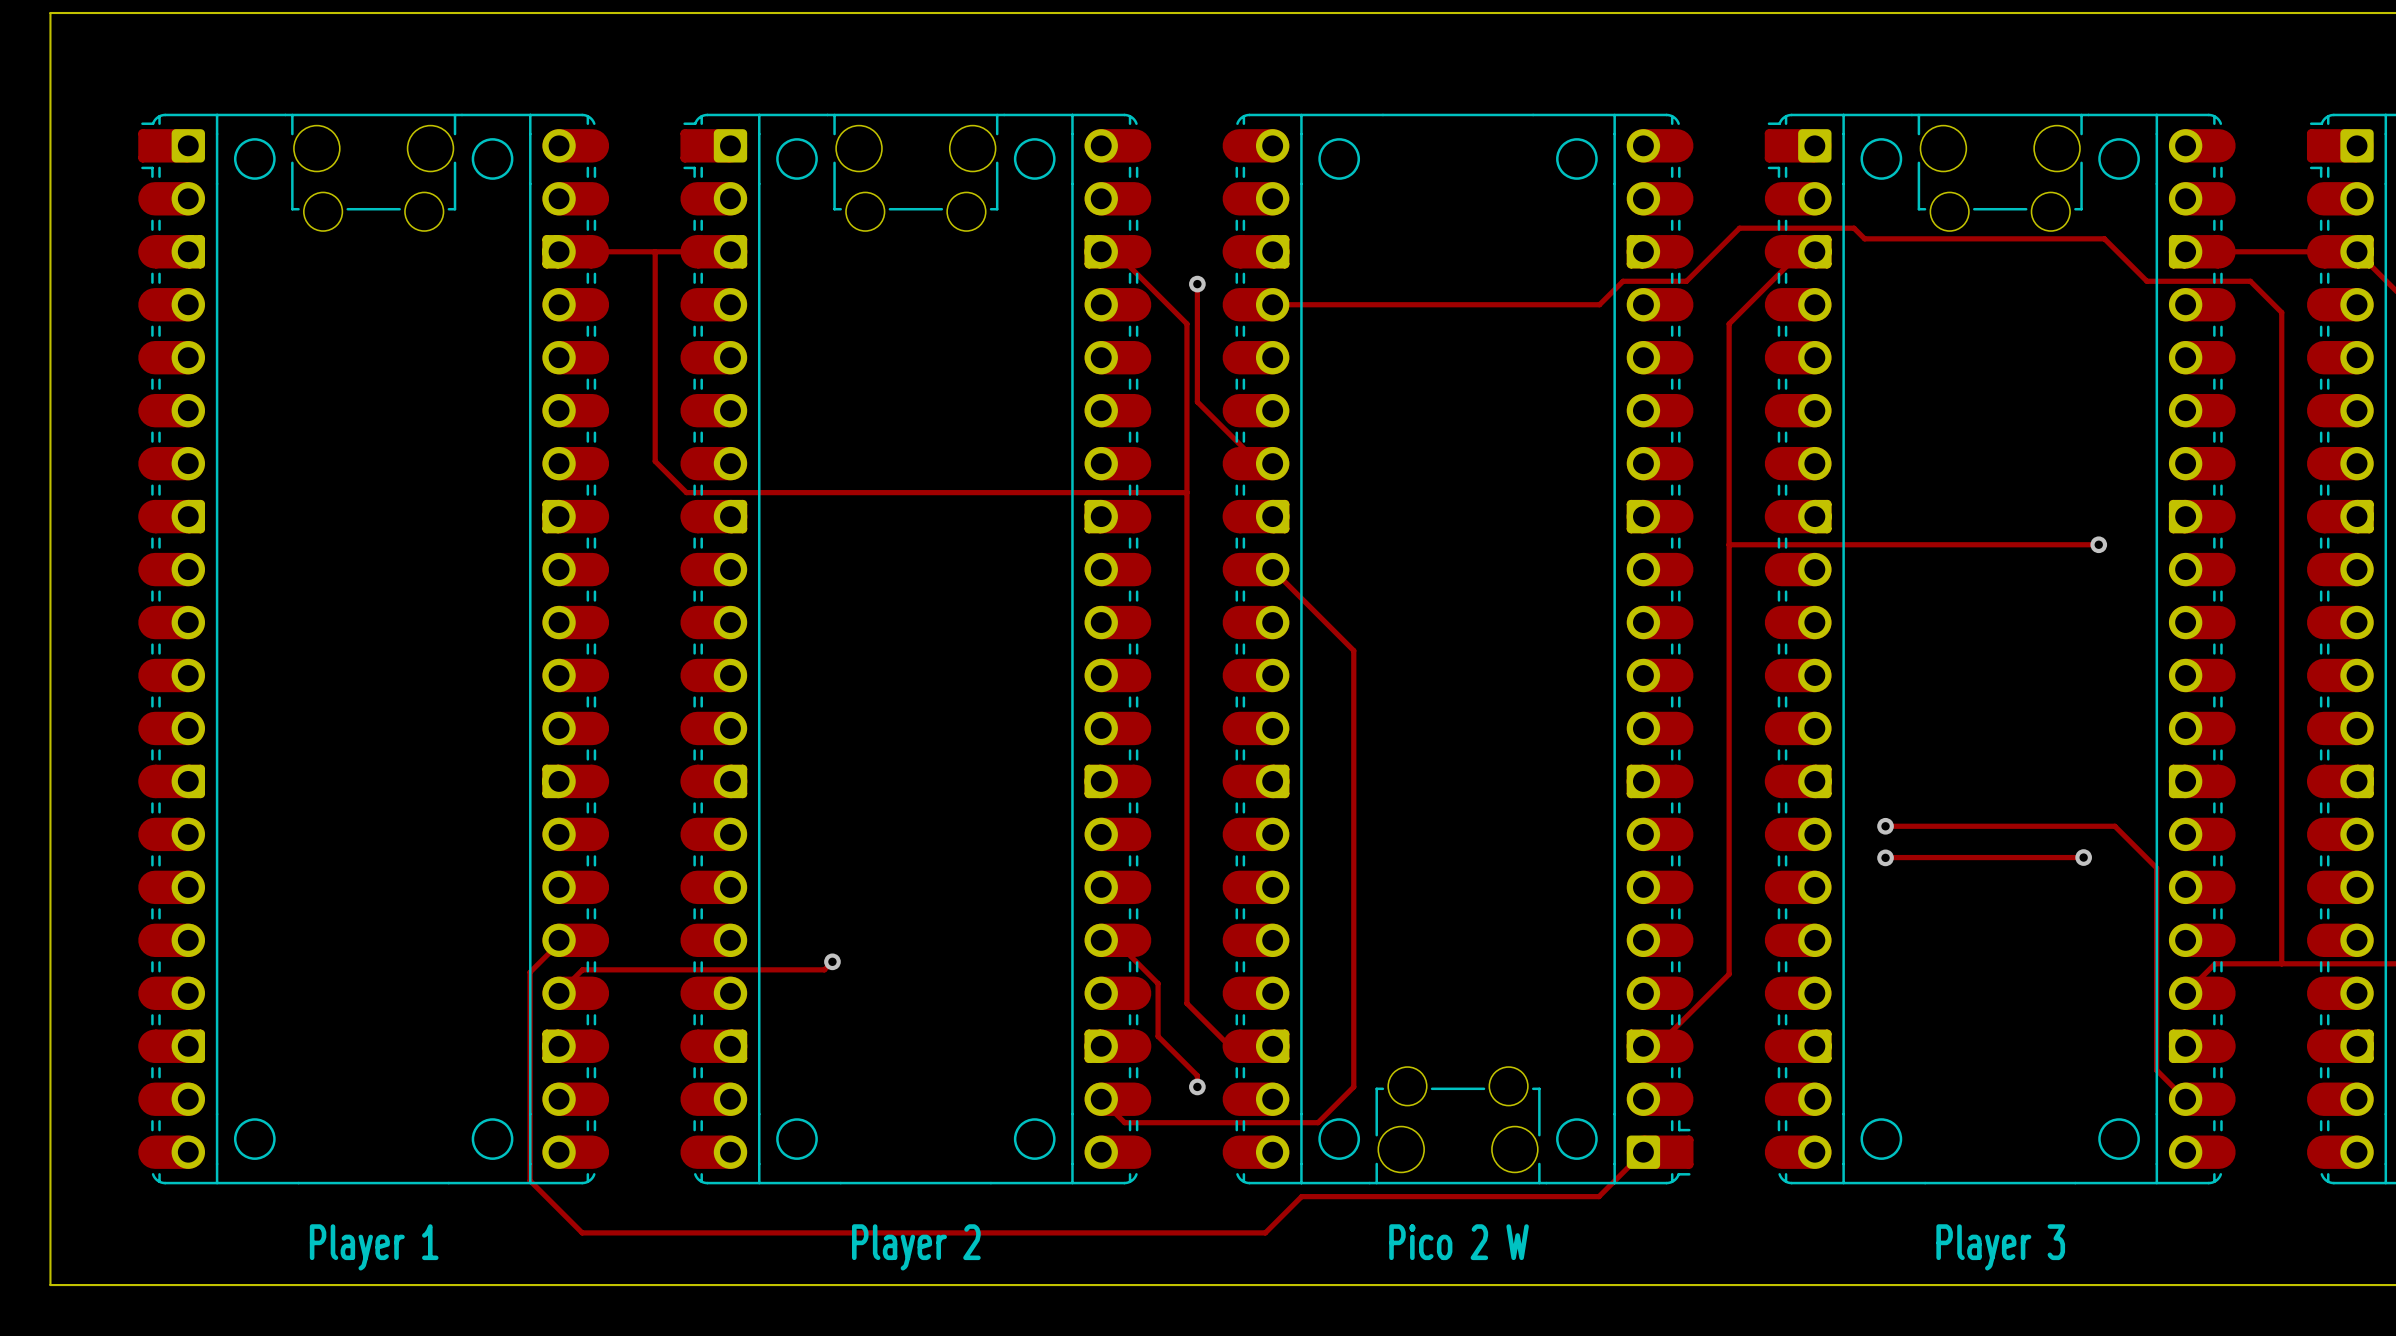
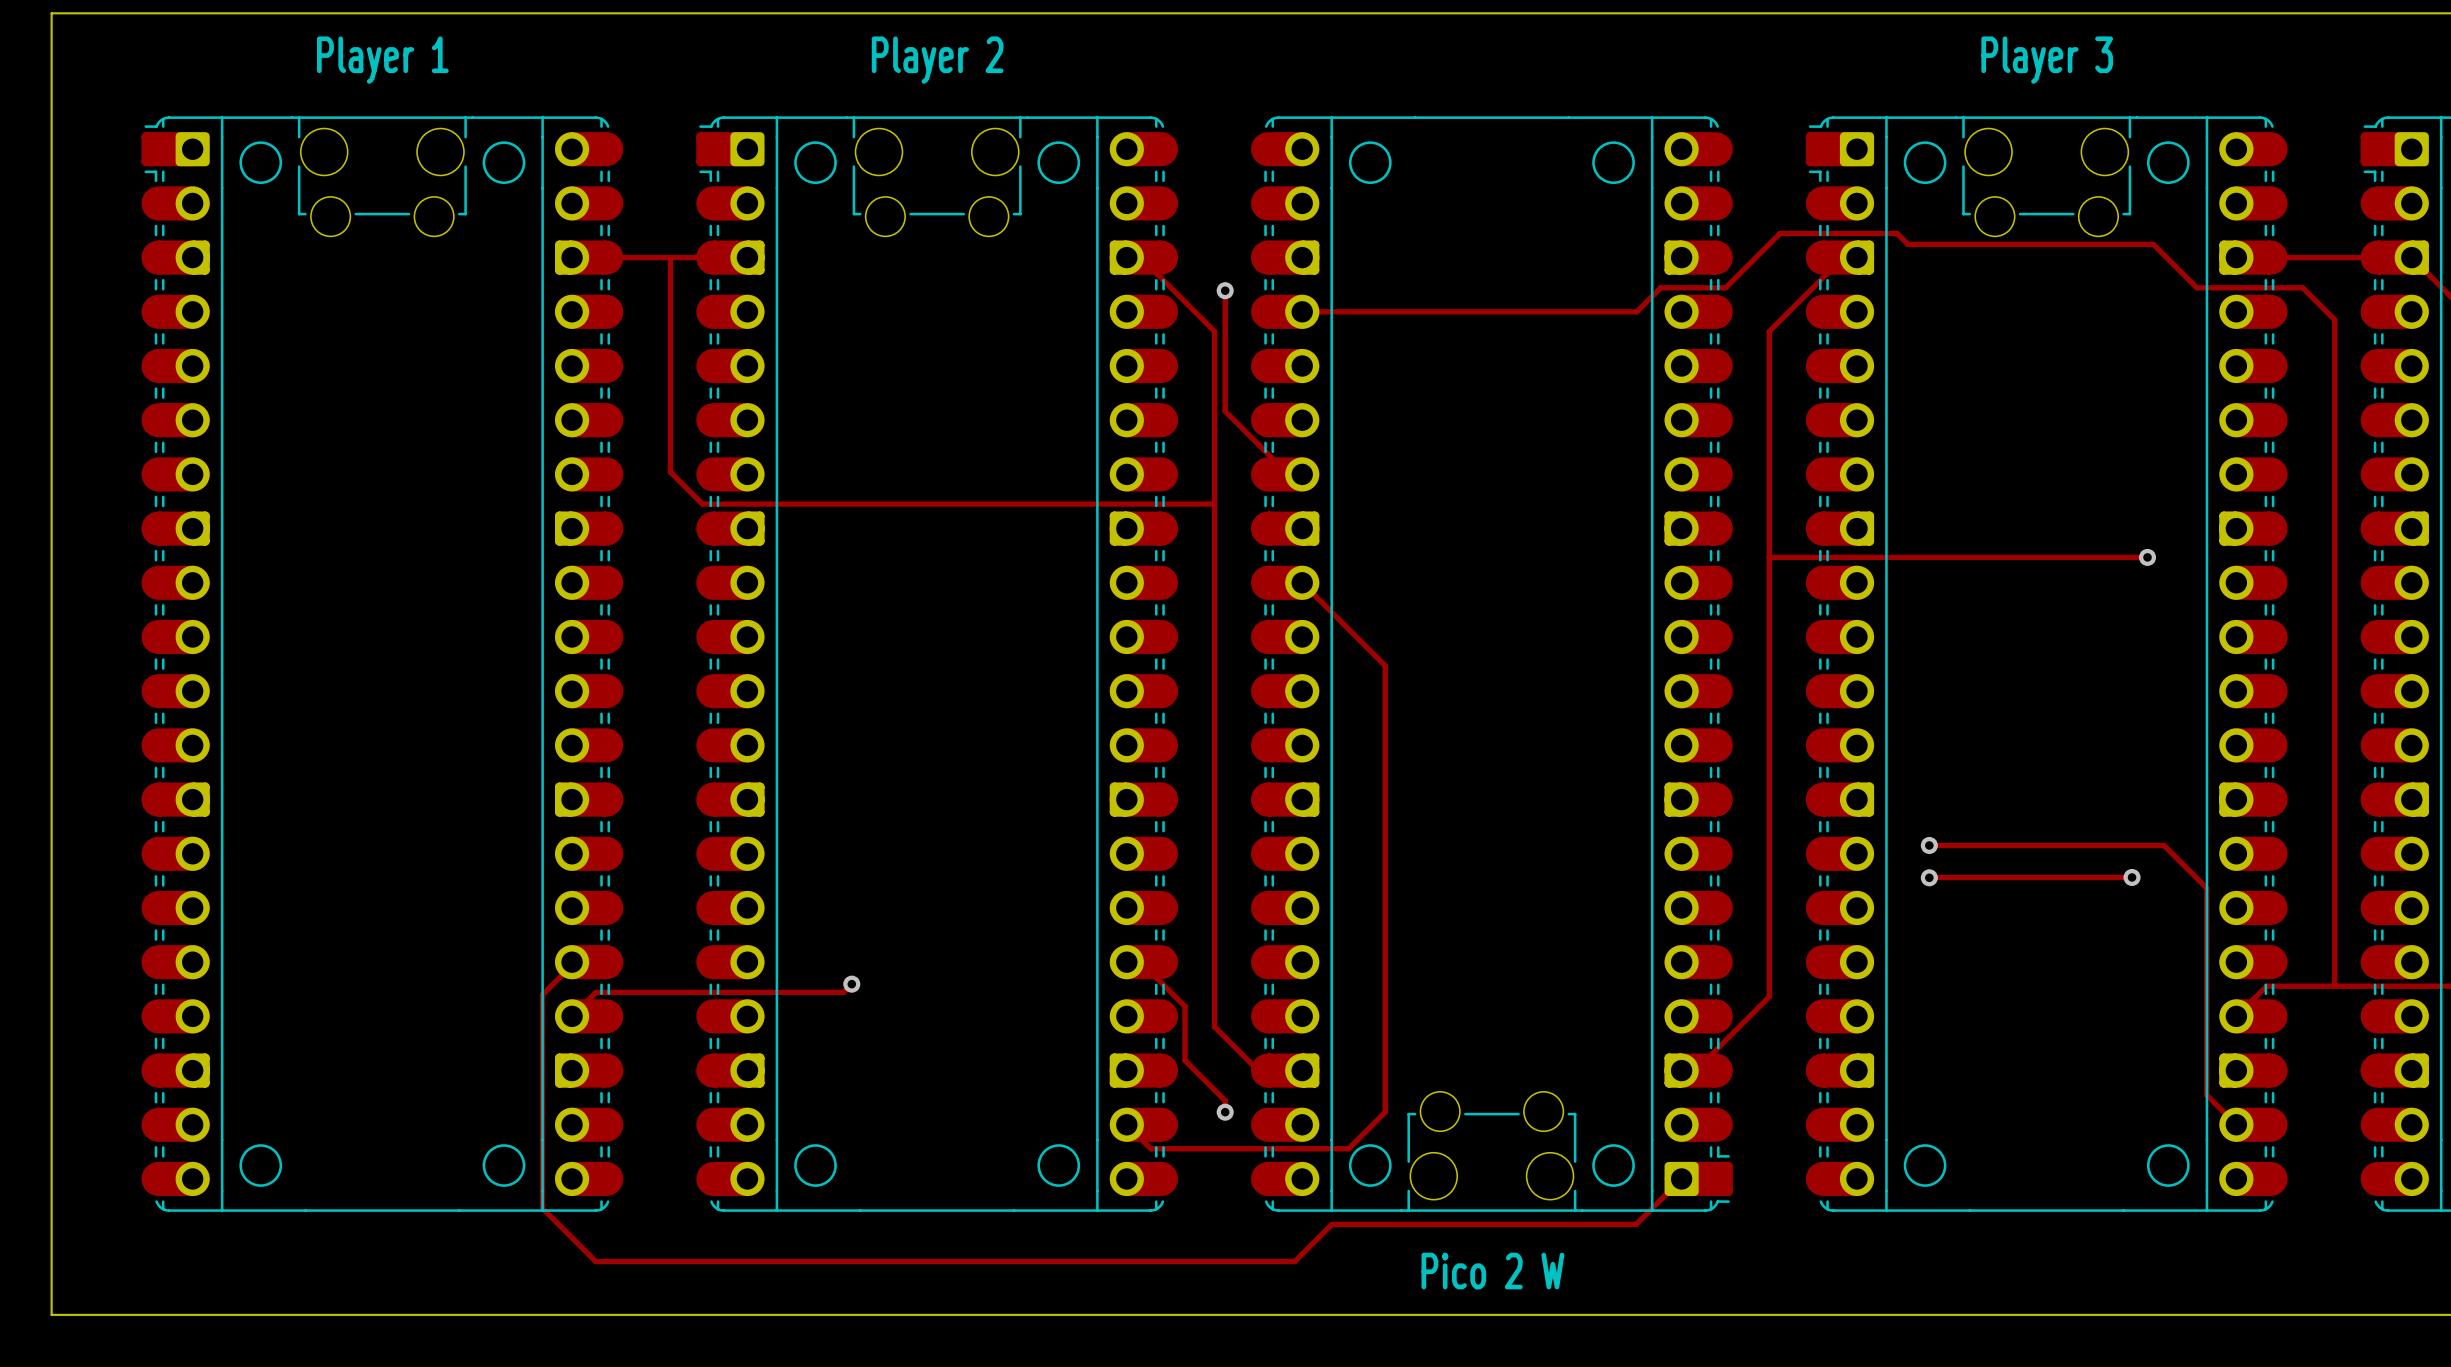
text: none -> Player 1 (382, 60)
text: none -> Player 2 (937, 60)
text: none -> Player 3 (2047, 60)
text: Player 1 (374, 1247) -> none
text: Player 2 (916, 1247) -> none
text: Player 3 (2000, 1247) -> none

